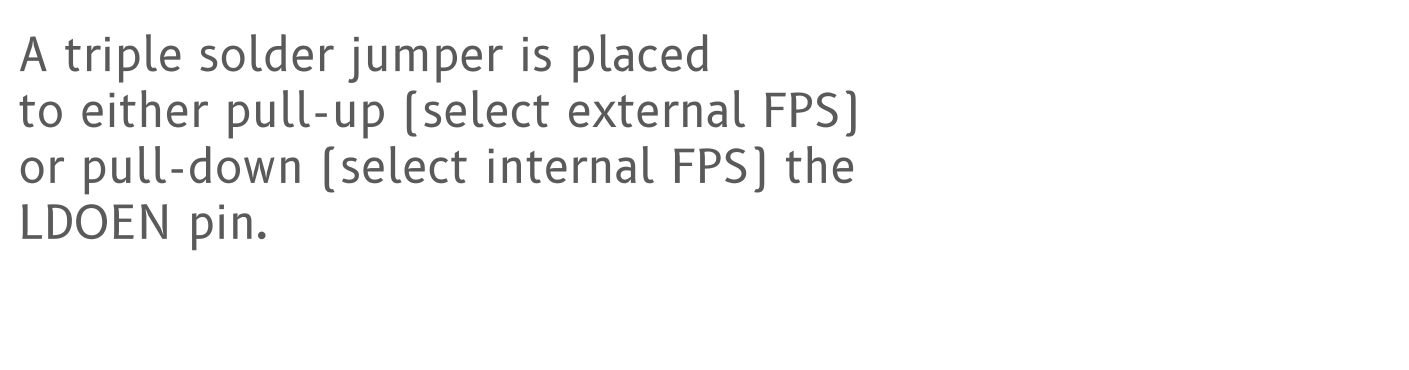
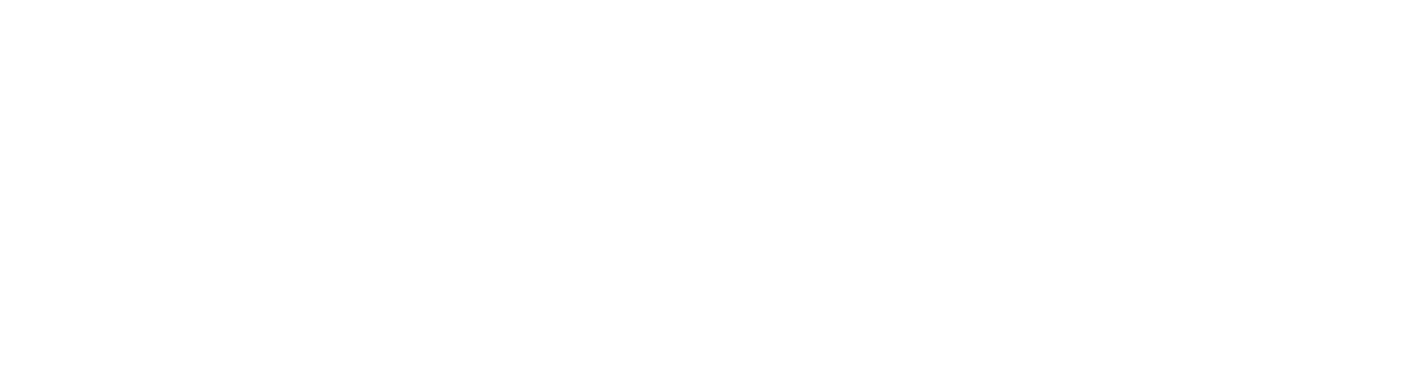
text: A triple solder jumper is placed (363, 58) -> none
text: to either pull-up (select external FPS) (437, 114) -> none
text: or pull-down (select internal FPS) the (436, 170) -> none
text: LDOEN pin. (143, 227) -> none

